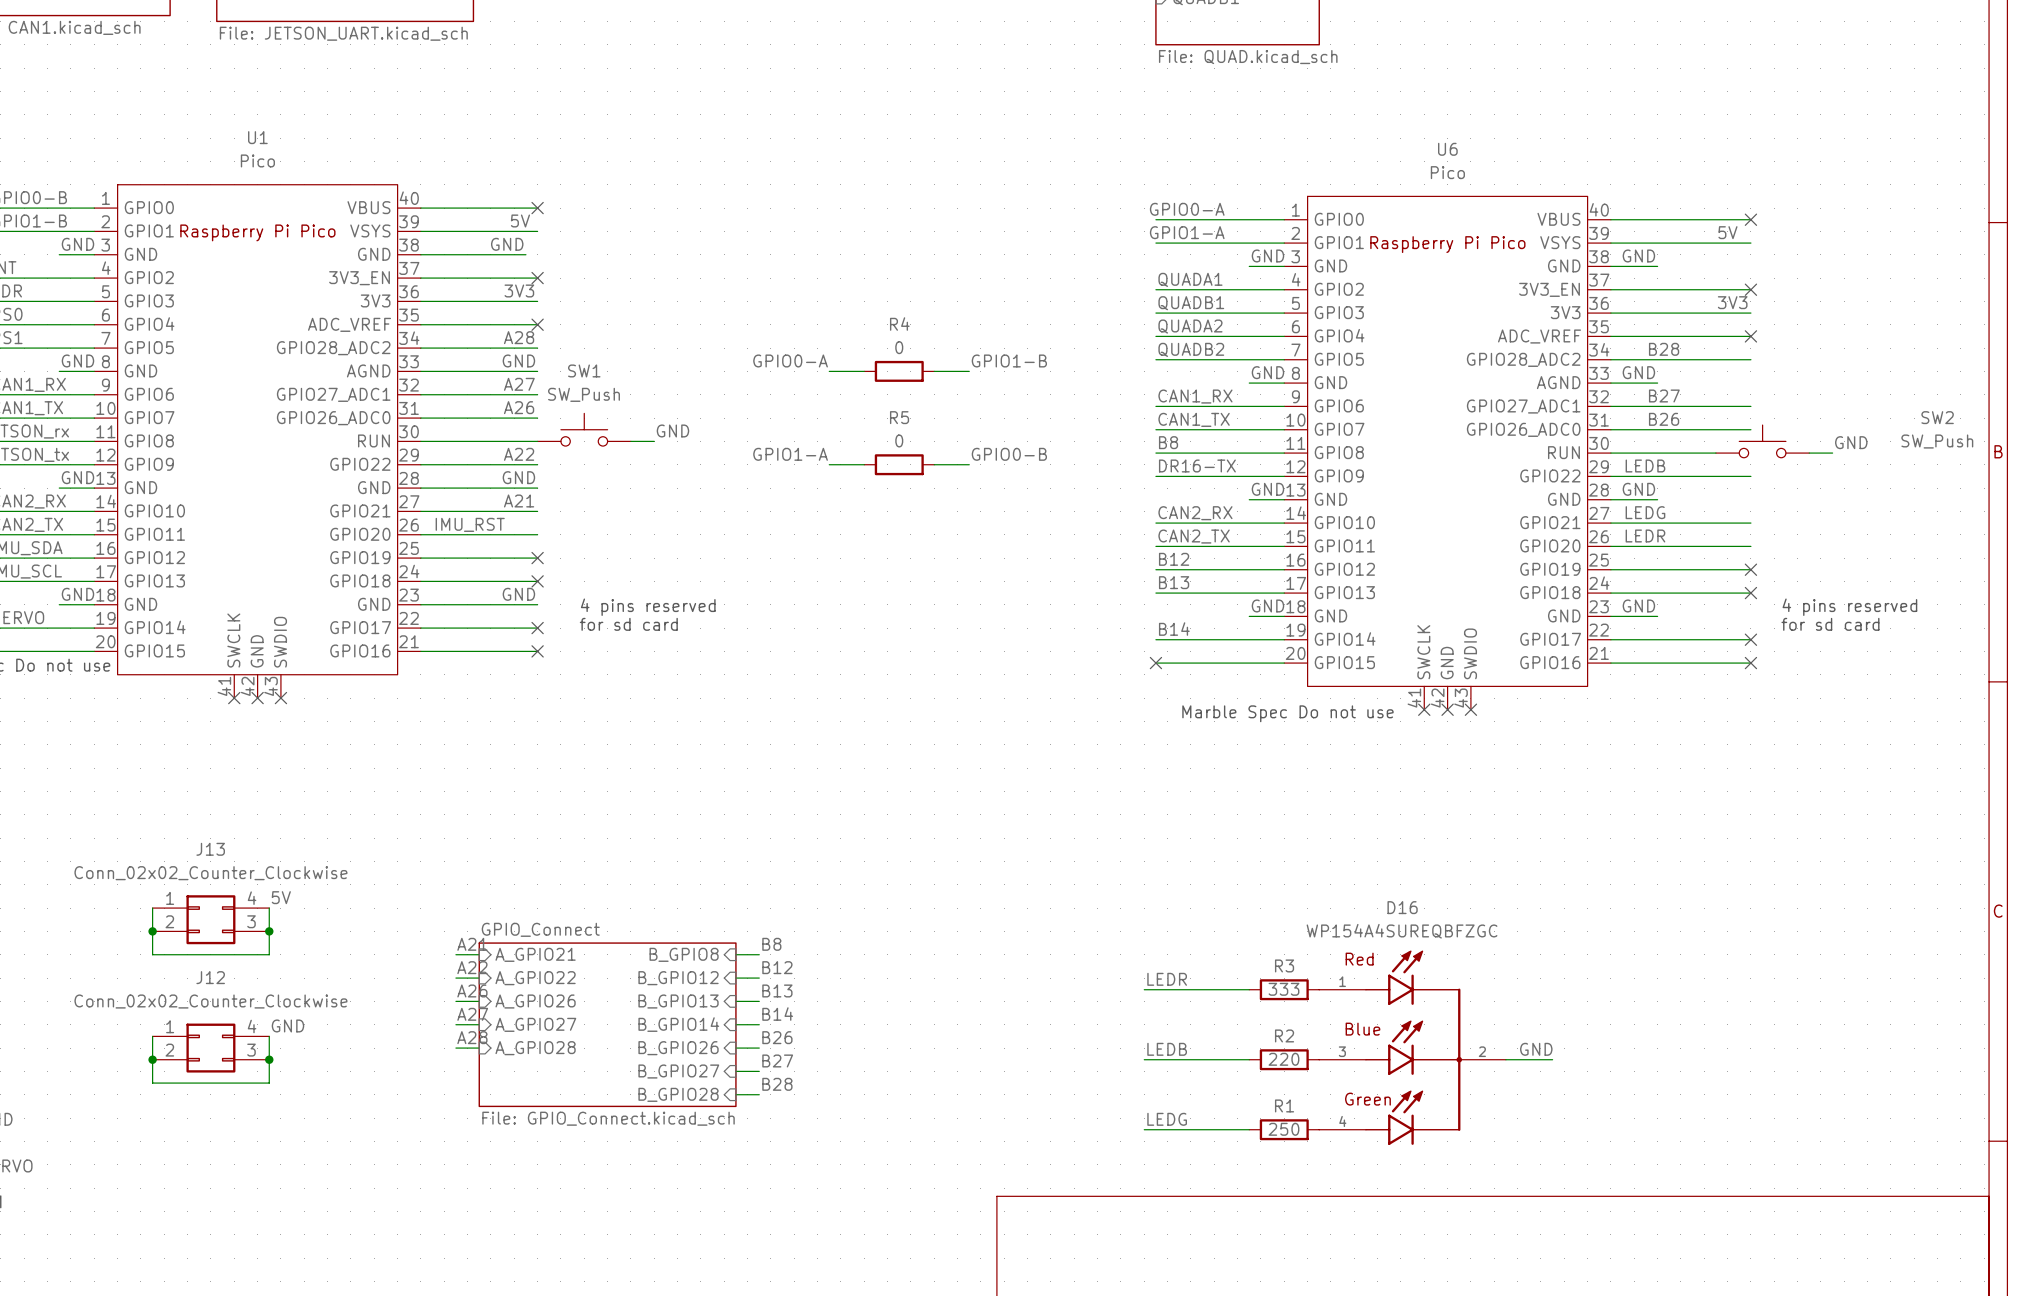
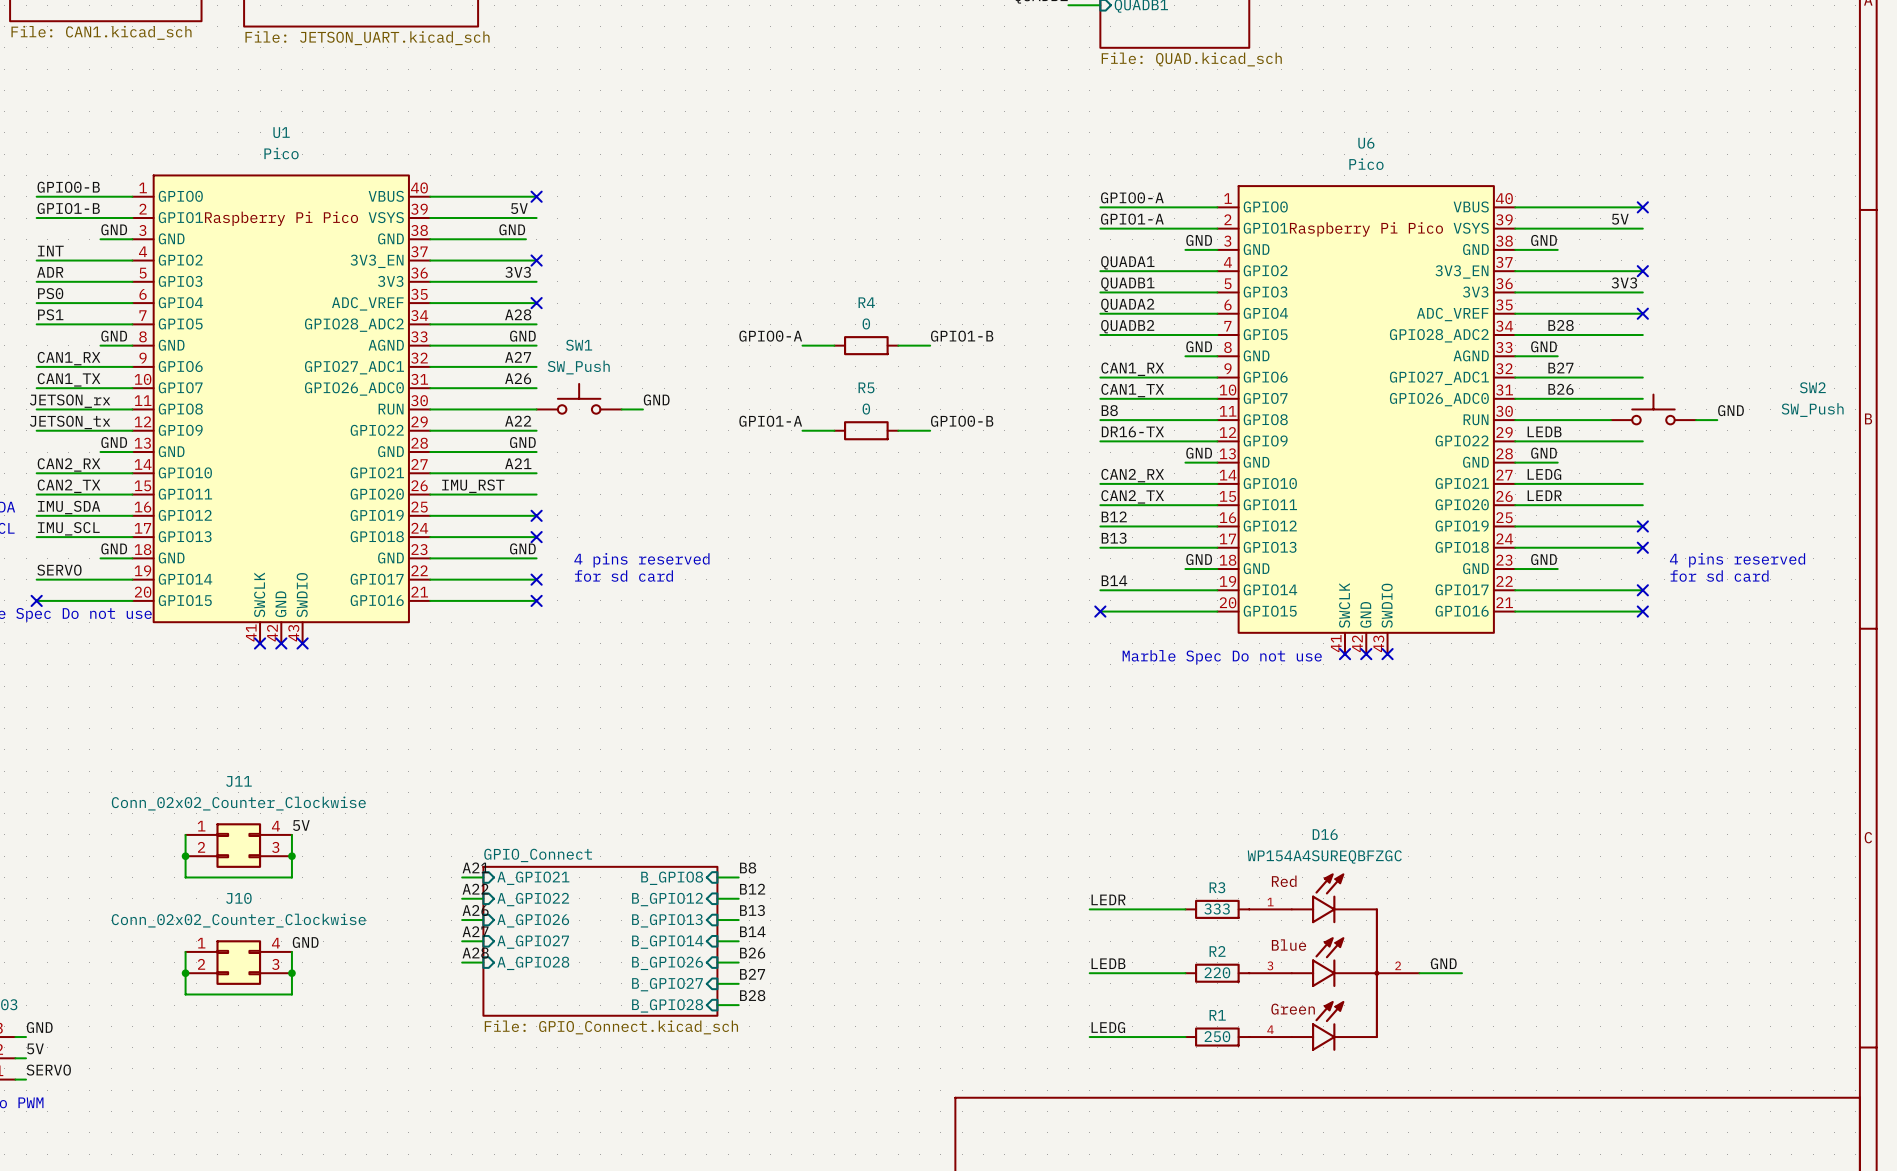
J13 name: J13 (210, 849) -> J11 (238, 781)
J12 name: J12 (210, 977) -> J10 (238, 898)

